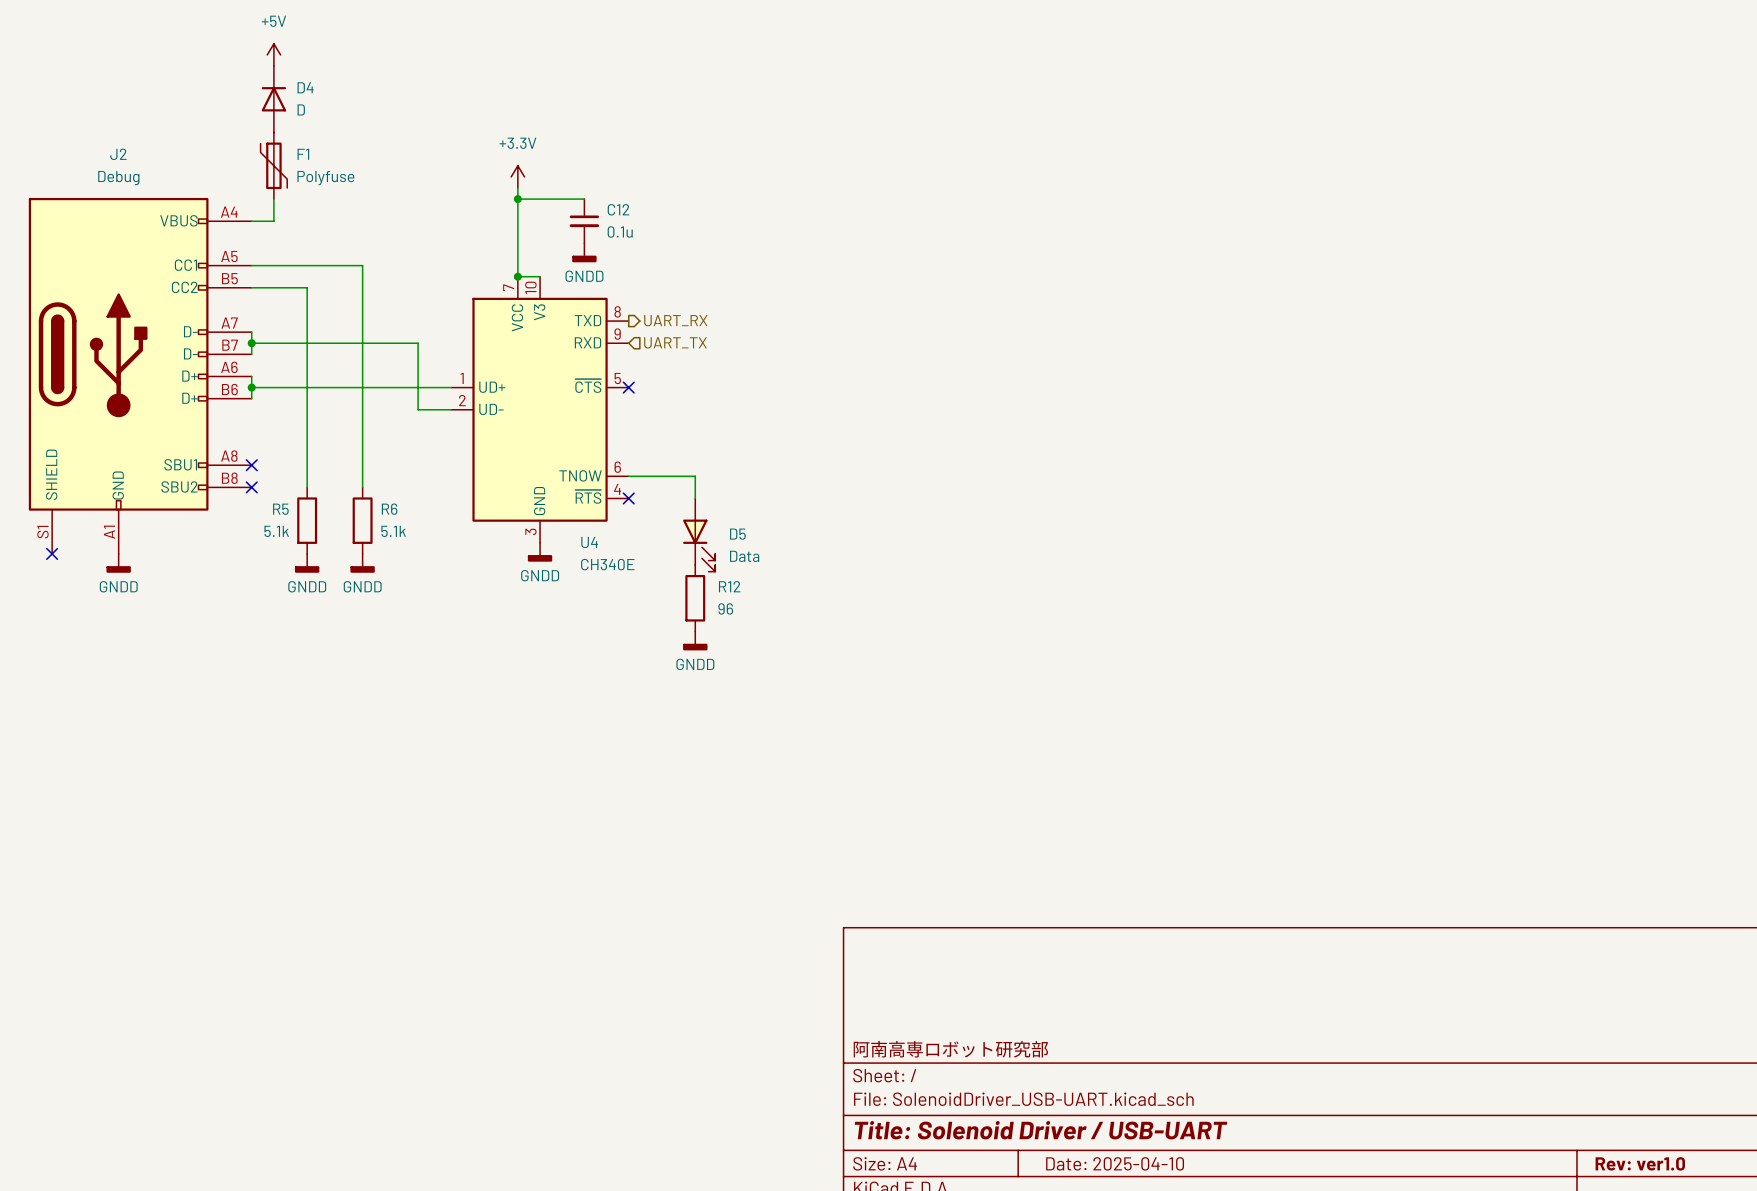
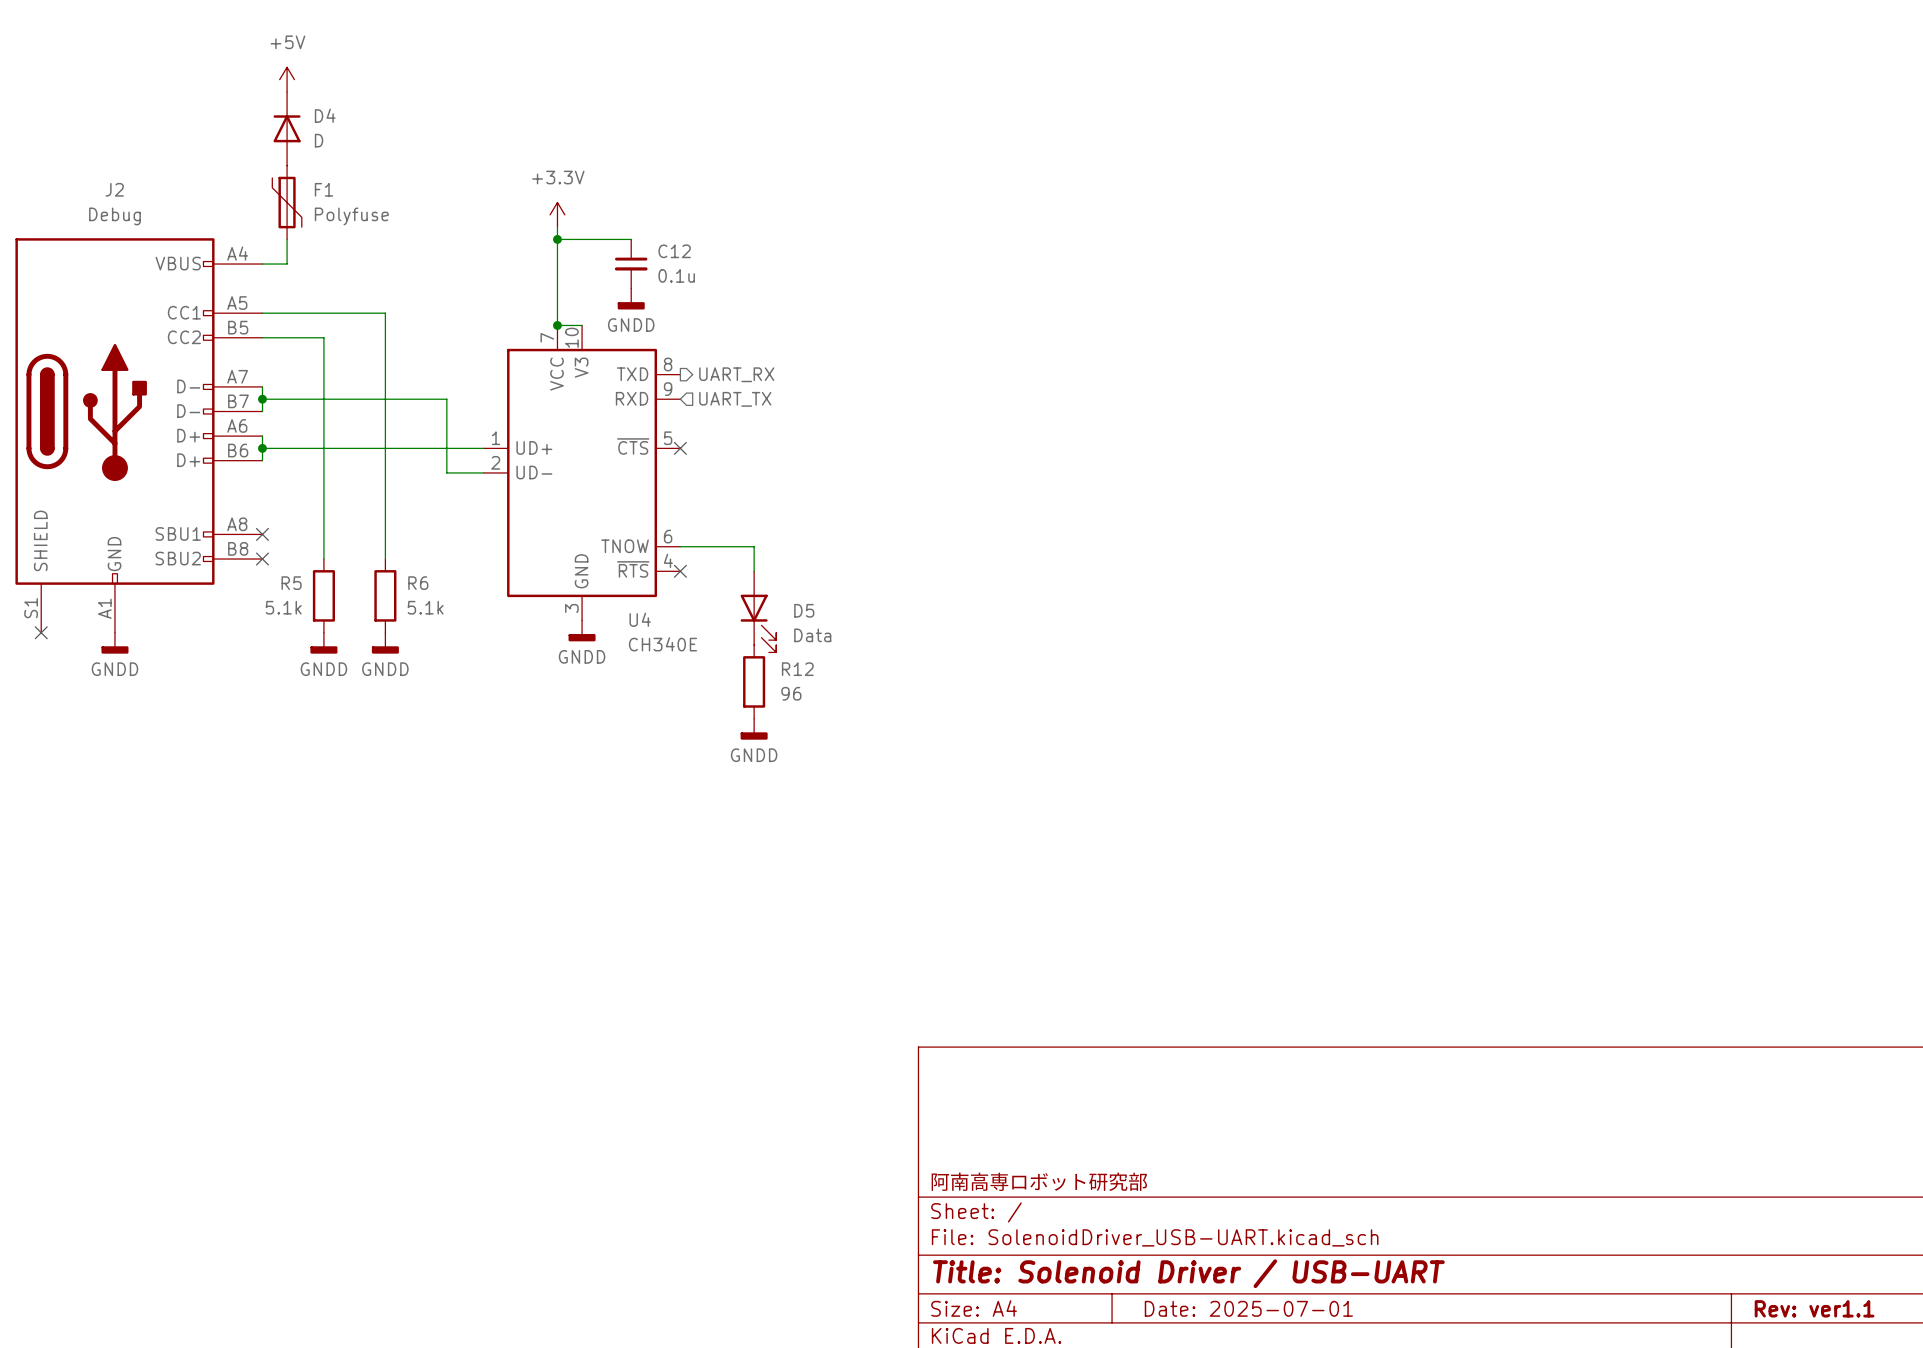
title block: Date: 2025-04-10 (1115, 1163) -> Date: 2025-07-01 (1248, 1308)
title block: Rev: ver1.0 (1640, 1163) -> Rev: ver1.1 (1814, 1308)

